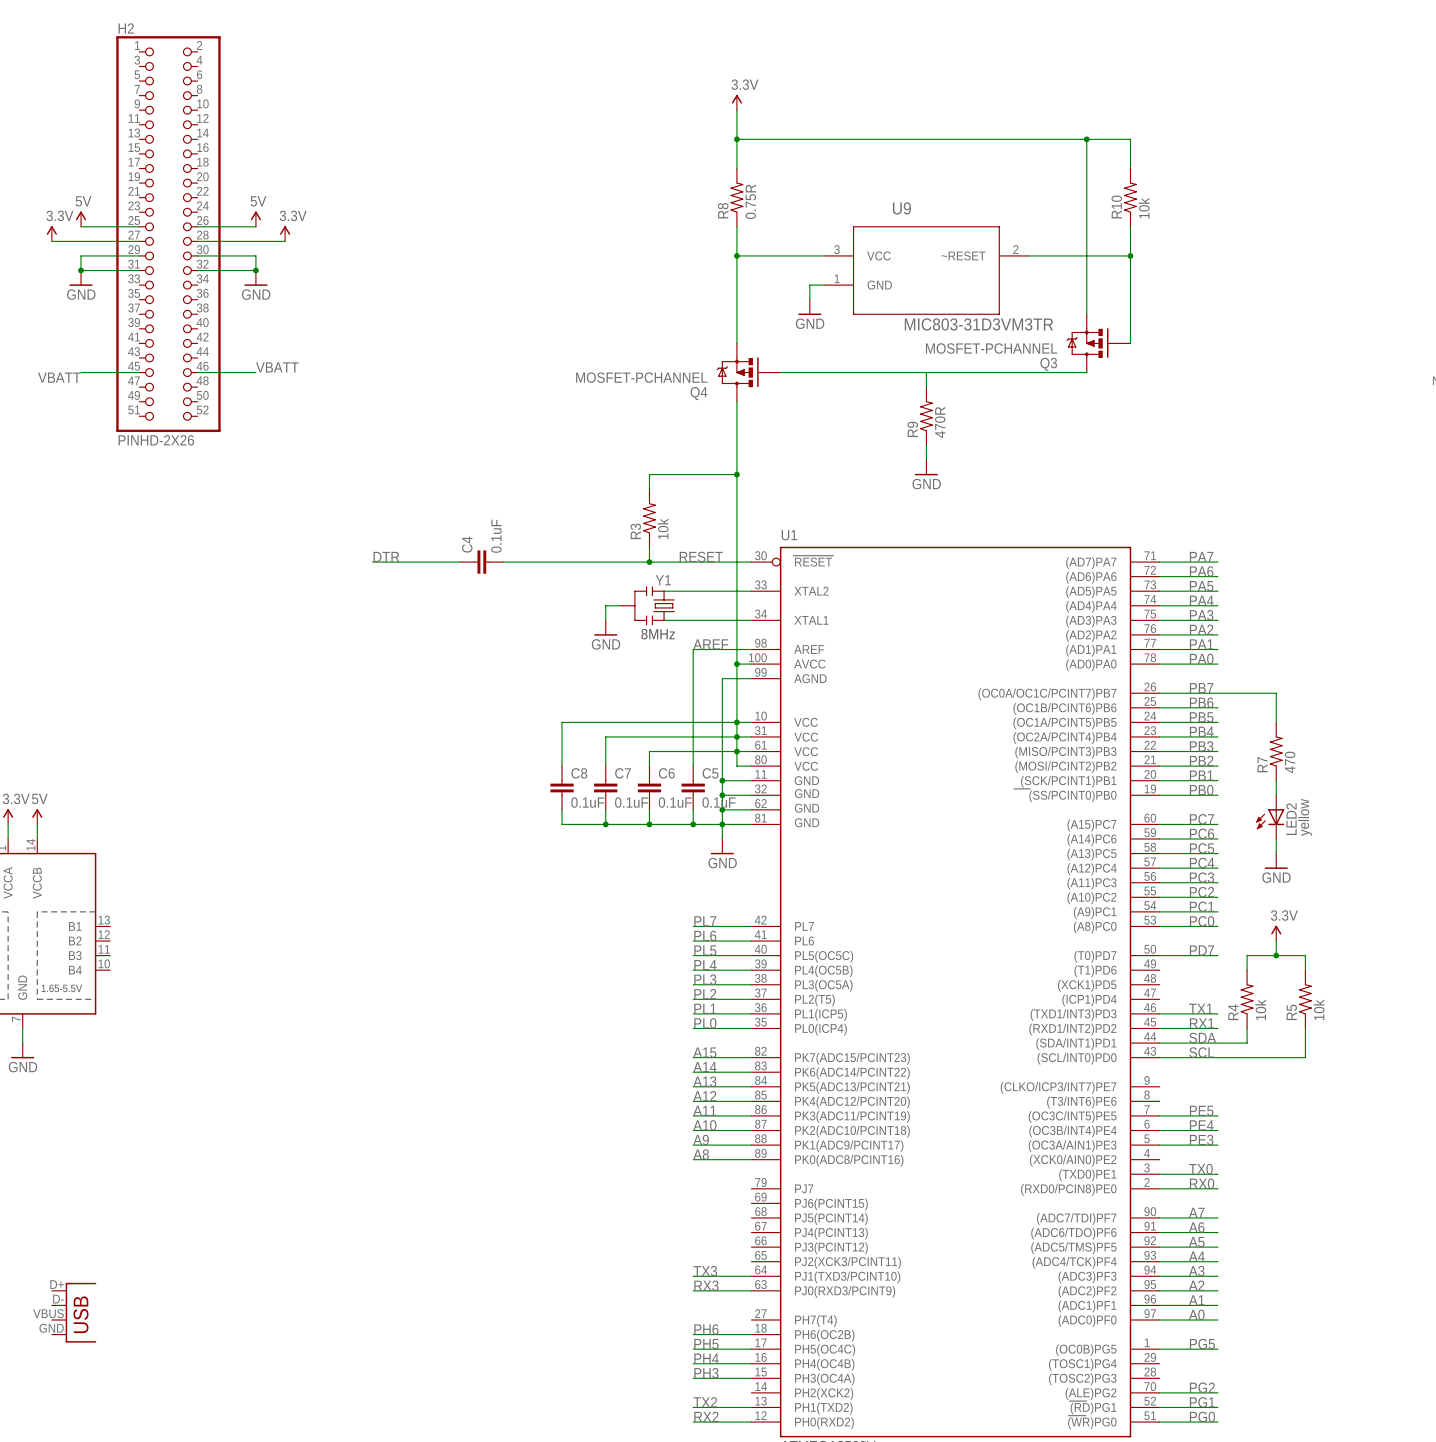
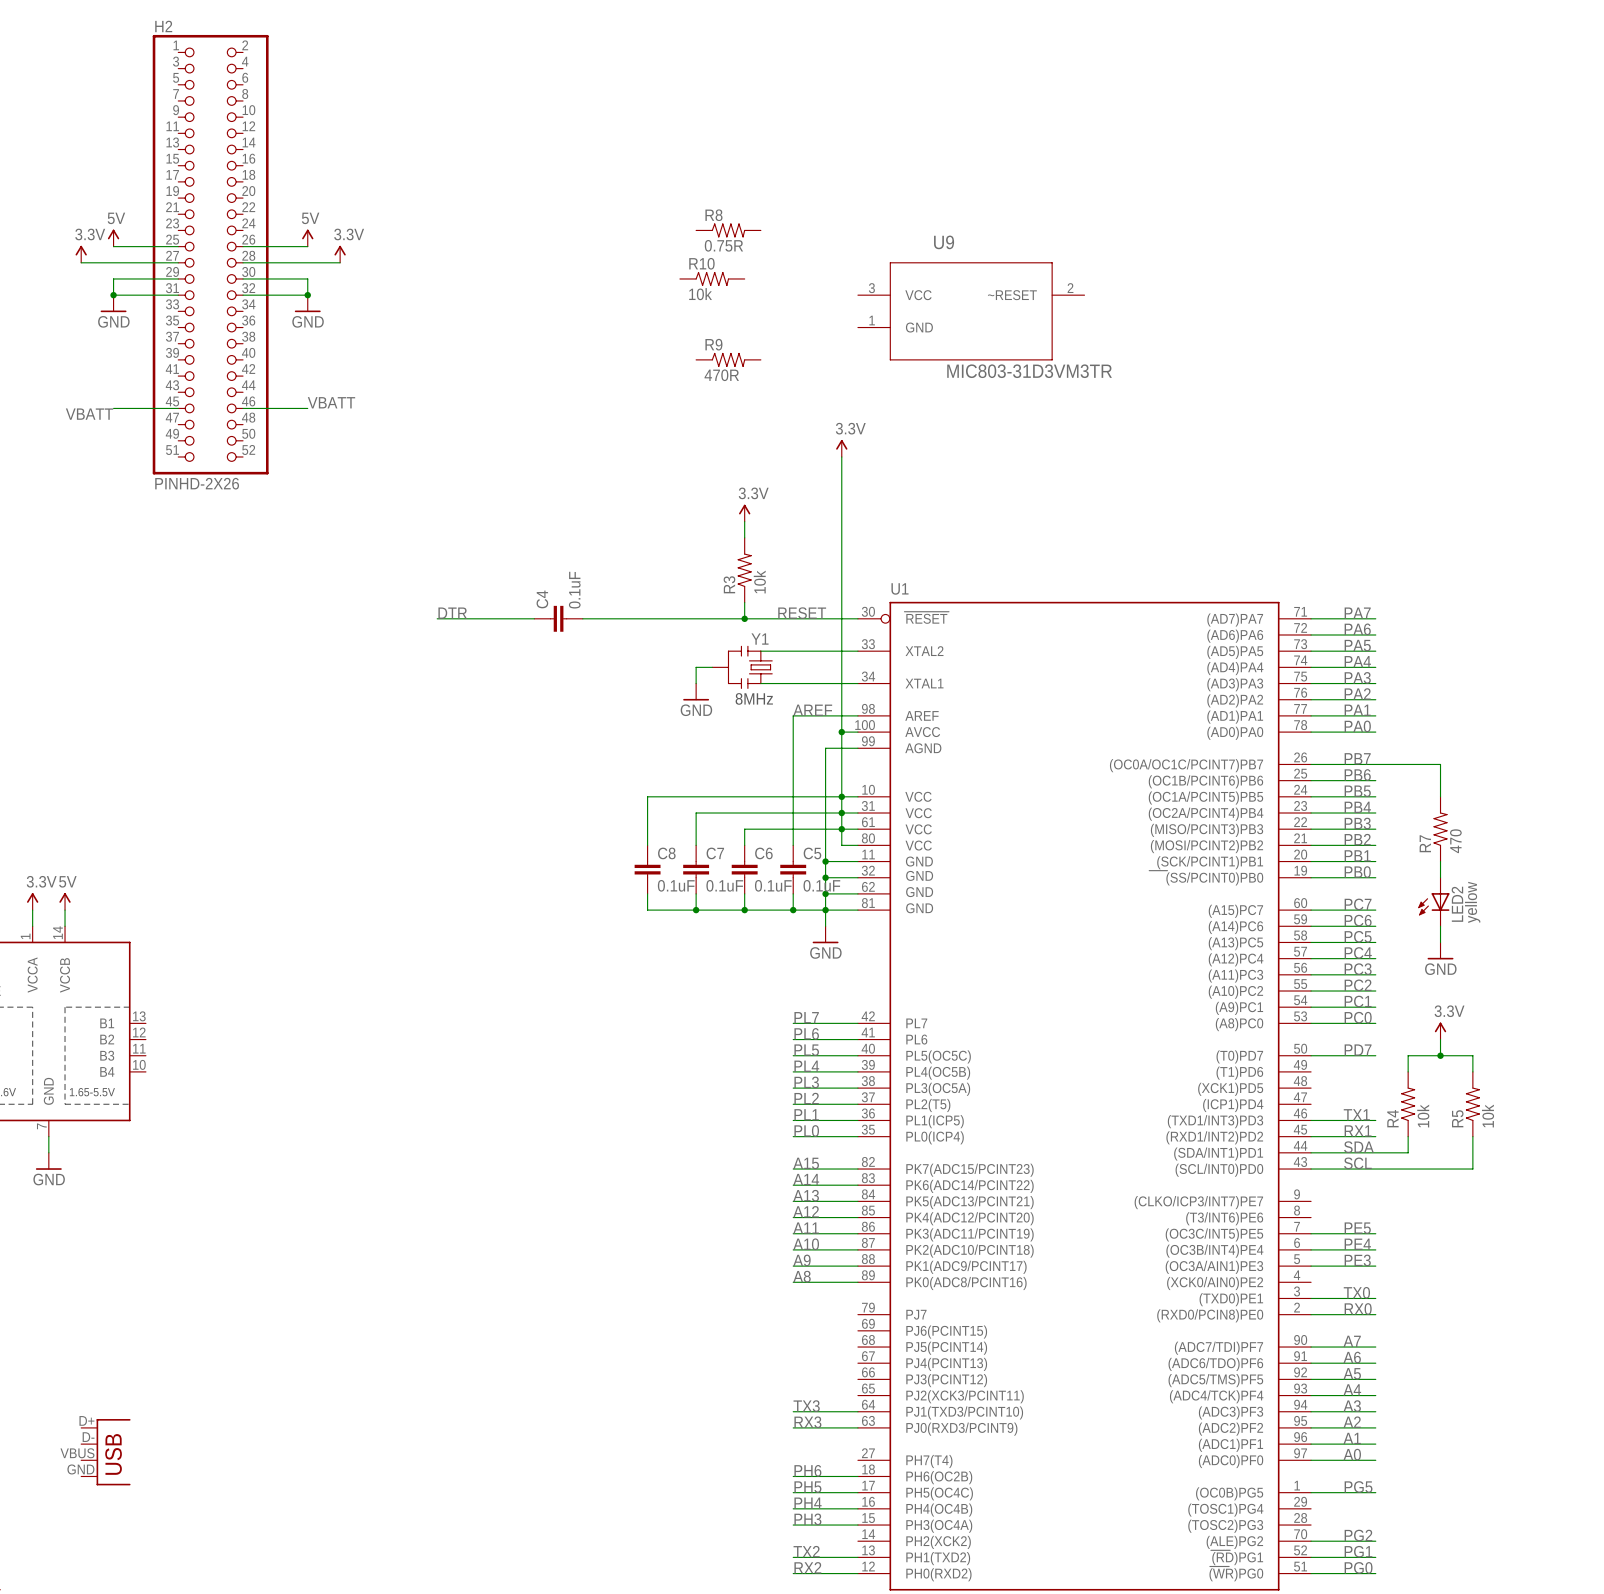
power symbol: 3.3V (736, 102) -> none
wire: (736, 110) (736, 168) -> none
wire: (736, 139) (1130, 139) (1130, 168) -> none
junction: (736, 139) -> none
wire: (1086, 139) (1086, 314) -> none
junction: (1086, 139) -> none
R8 rotation: 0° (736, 197) -> 90° clockwise (728, 230)
R8 position: (736, 197) -> (728, 230)
R10 rotation: 0° (1130, 197) -> 90° clockwise (712, 278)
R10 position: (1130, 197) -> (712, 278)
wire: (736, 226) (736, 343) -> none
wire: (1130, 226) (1130, 343) -> none
wire: (736, 255) (824, 255) -> none
junction: (736, 255) -> none
wire: (1028, 255) (1130, 255) -> none
junction: (1130, 255) -> none
U9 position: (926, 270) -> (971, 311)
wire: (824, 285) (809, 285) (809, 299) -> none
power symbol: GND (809, 307) -> none
Q3: MOSFET-PCHANNEL (1098, 343) -> none
Q4: MOSFET-PCHANNEL (748, 372) -> none
wire: (780, 372) (1086, 372) -> none
wire: (926, 372) (926, 387) -> none
power symbol: none -> 3.3V (841, 448)
R9 rotation: 0° (926, 416) -> 90° clockwise (728, 359)
R9 position: (926, 416) -> (728, 359)
wire: (926, 445) (926, 460) -> none
power symbol: none -> 3.3V (744, 513)
power symbol: GND (926, 467) -> none
wire: (649, 474) (736, 474) -> none
junction: (736, 474) -> none

